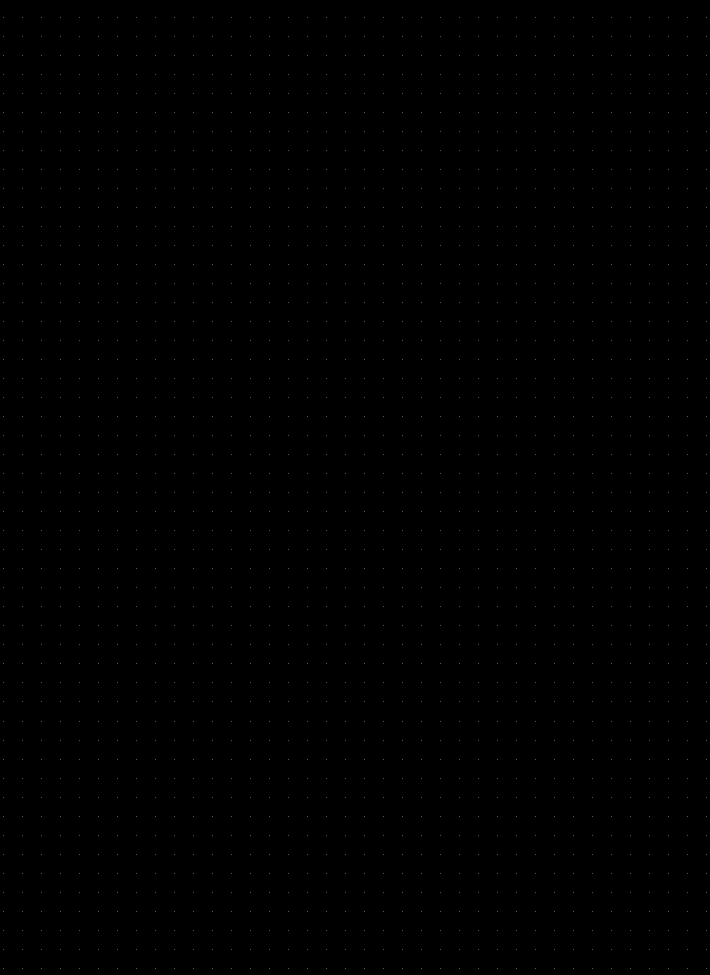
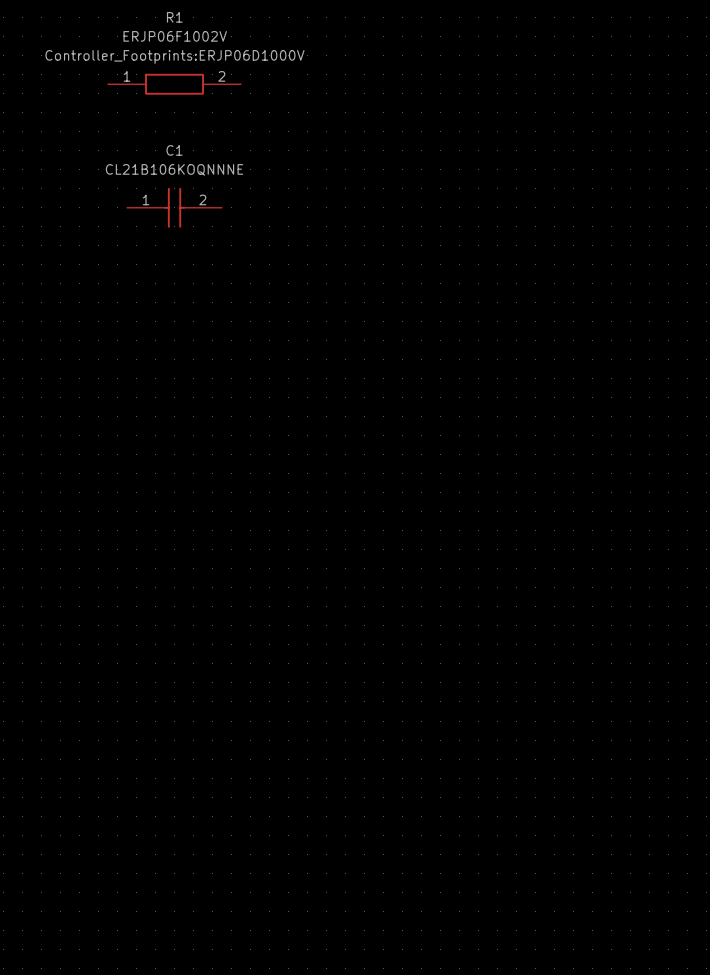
R1: none -> ERJP06F1002V (174, 84)
C1: none -> CL21B106KOQNNNE (174, 207)

